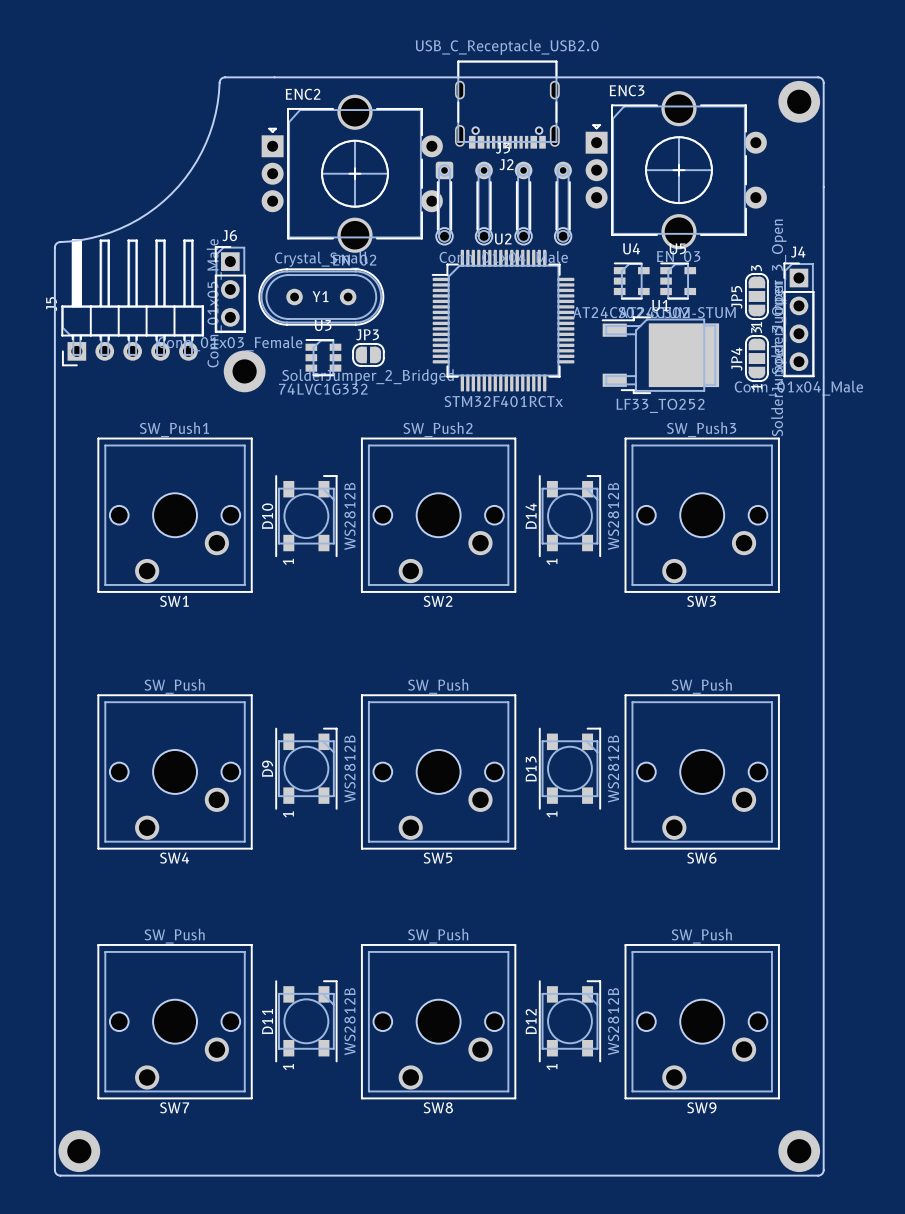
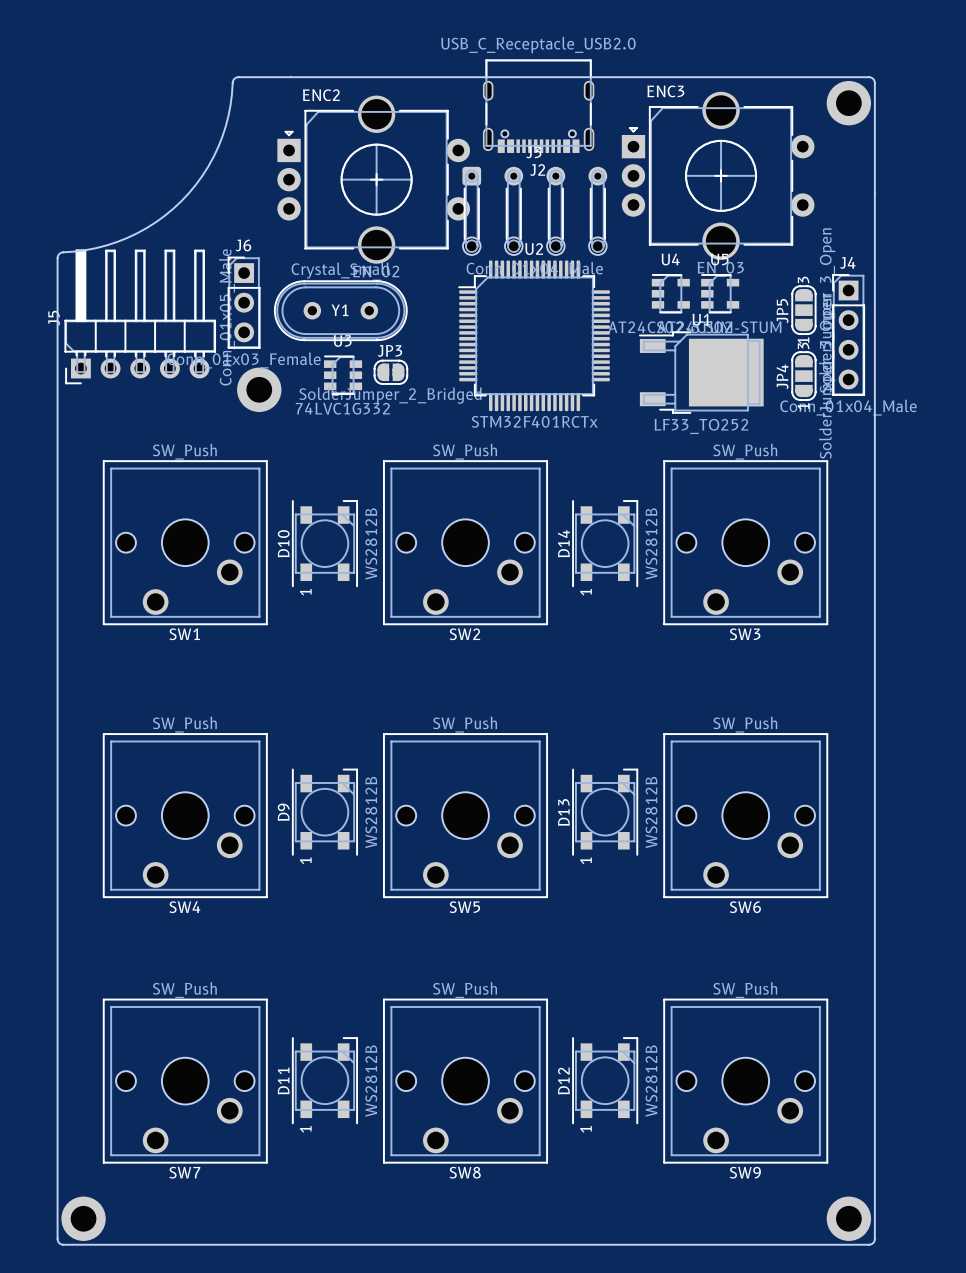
SW1 value: SW_Push1 (174, 429) -> SW_Push (184, 451)
SW2 value: SW_Push2 (438, 429) -> SW_Push (465, 451)
SW3 value: SW_Push3 (701, 429) -> SW_Push (745, 451)

